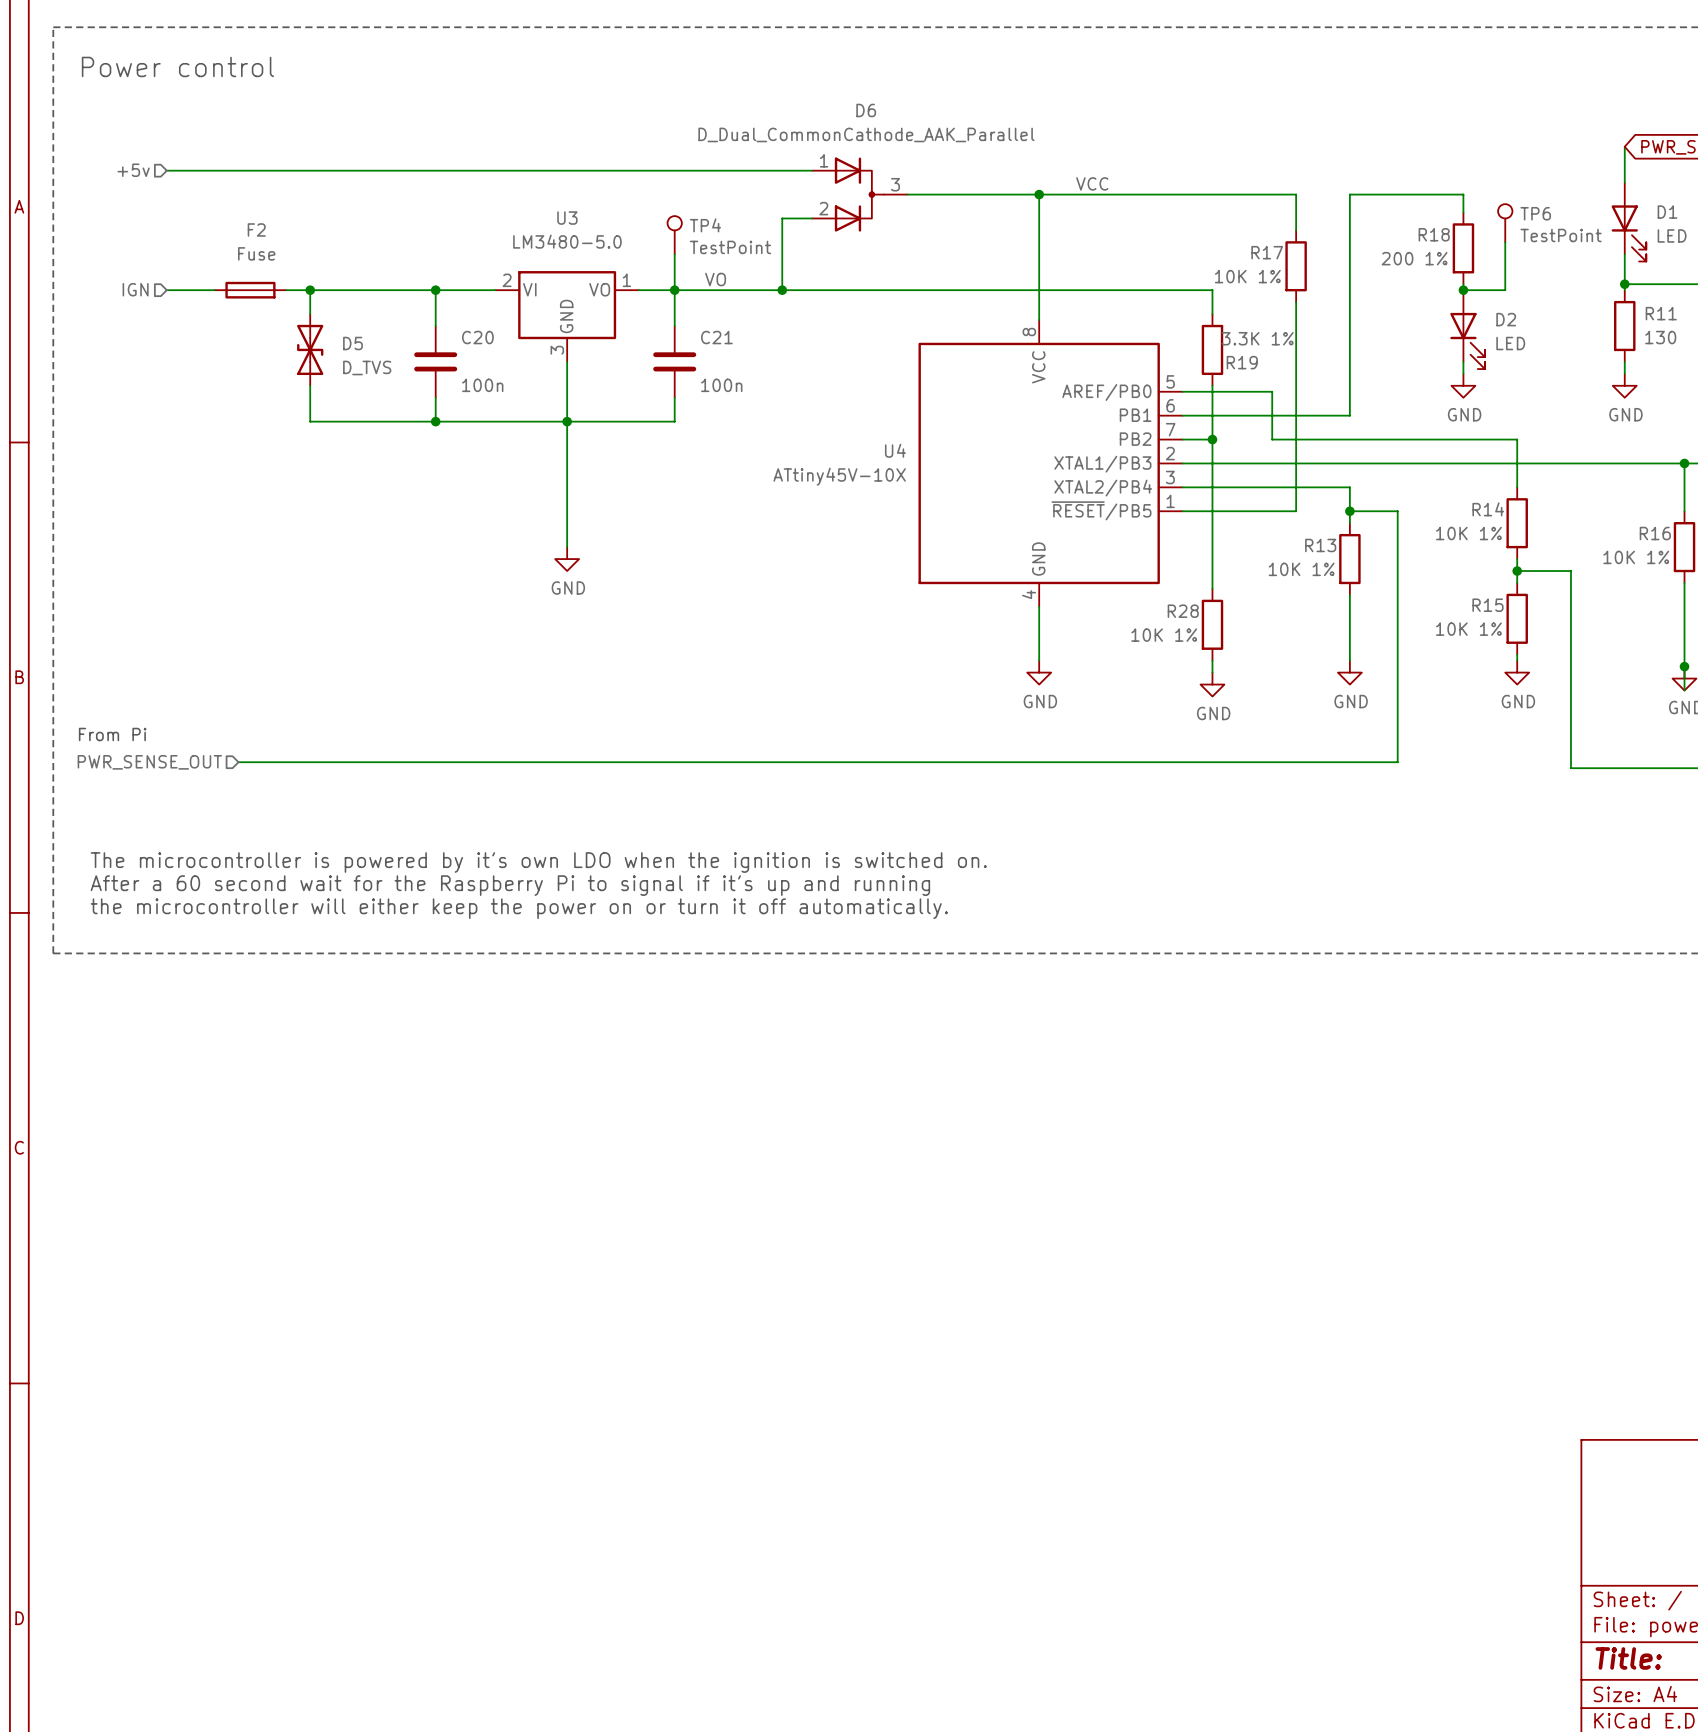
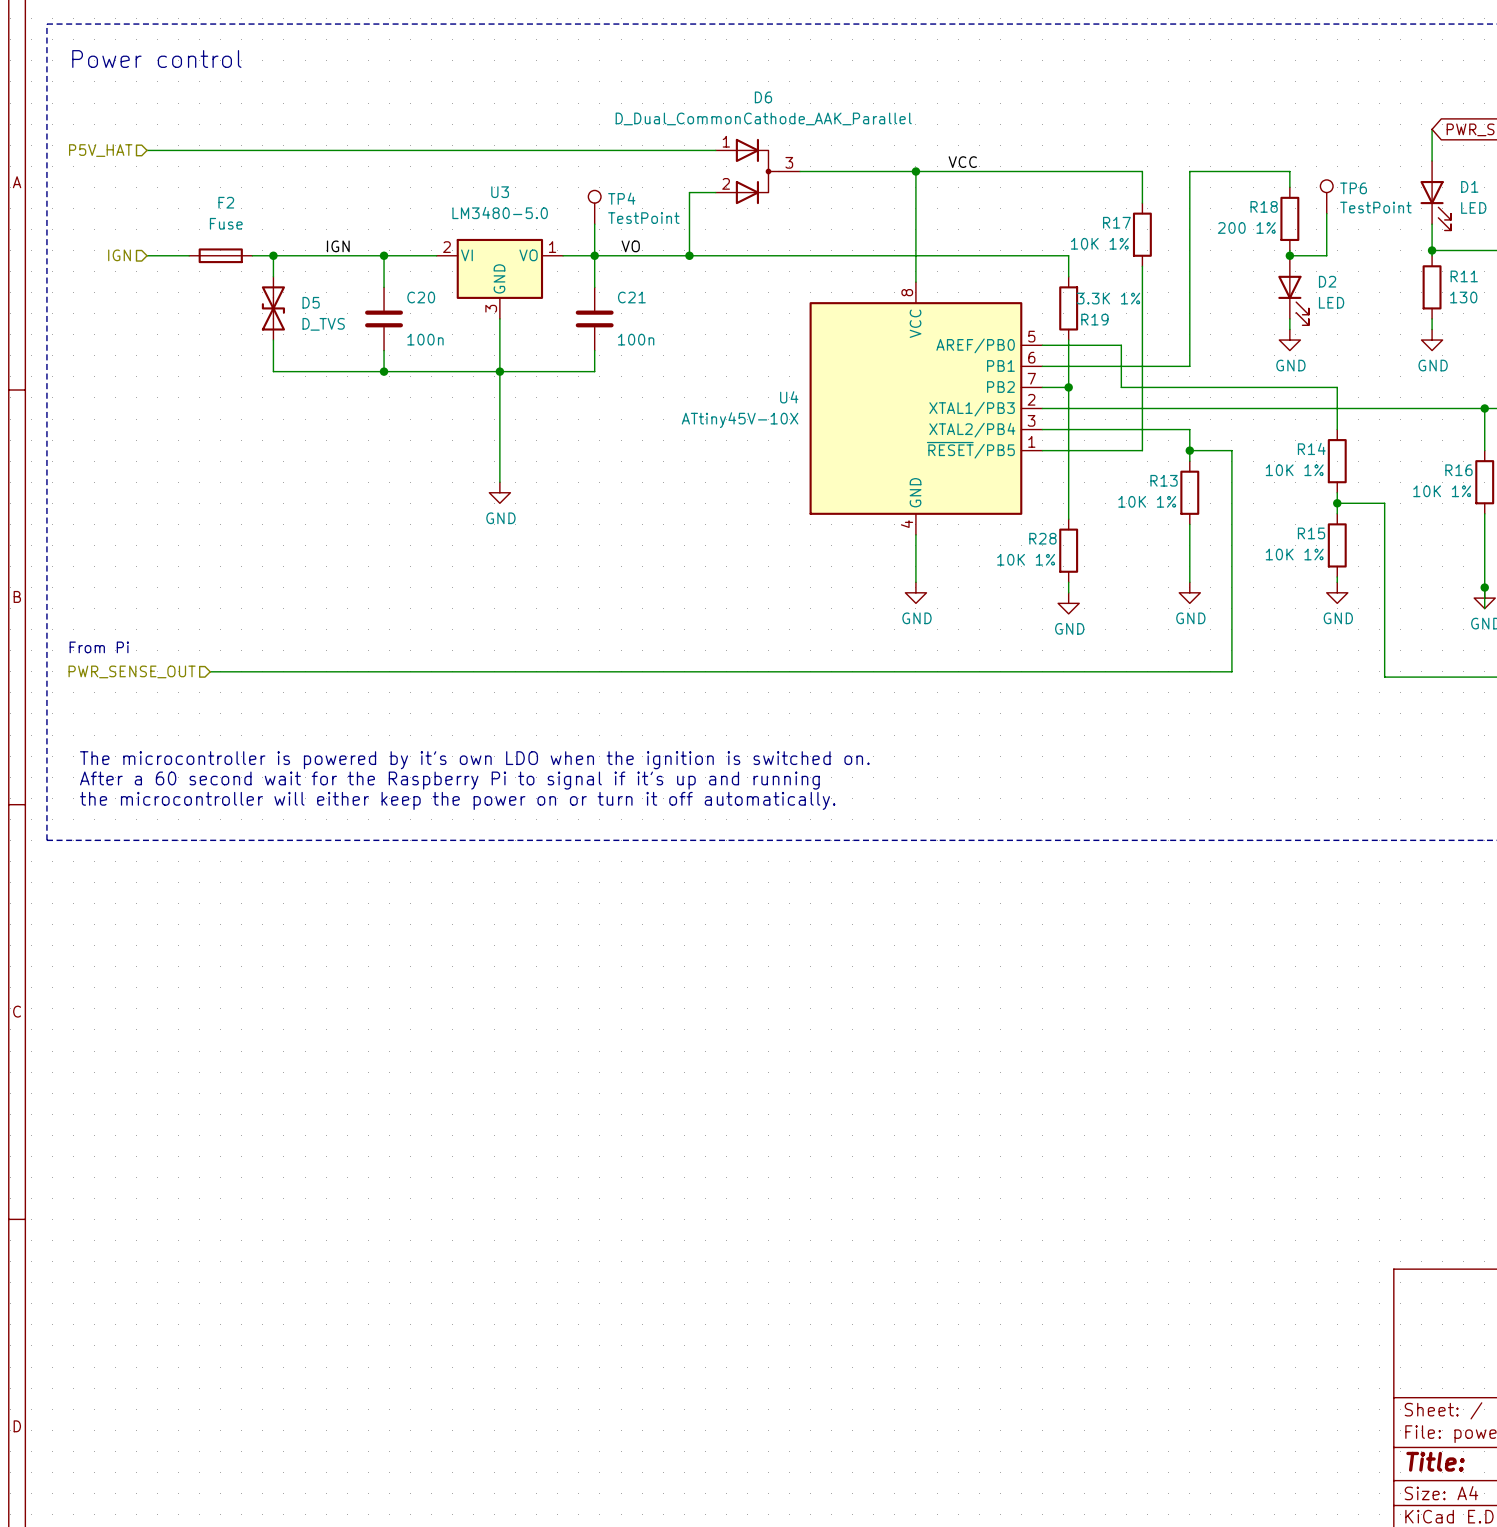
hierarchical label: +5v (133, 170) -> P5V_HAT (100, 150)
label: none -> IGN (338, 246)

